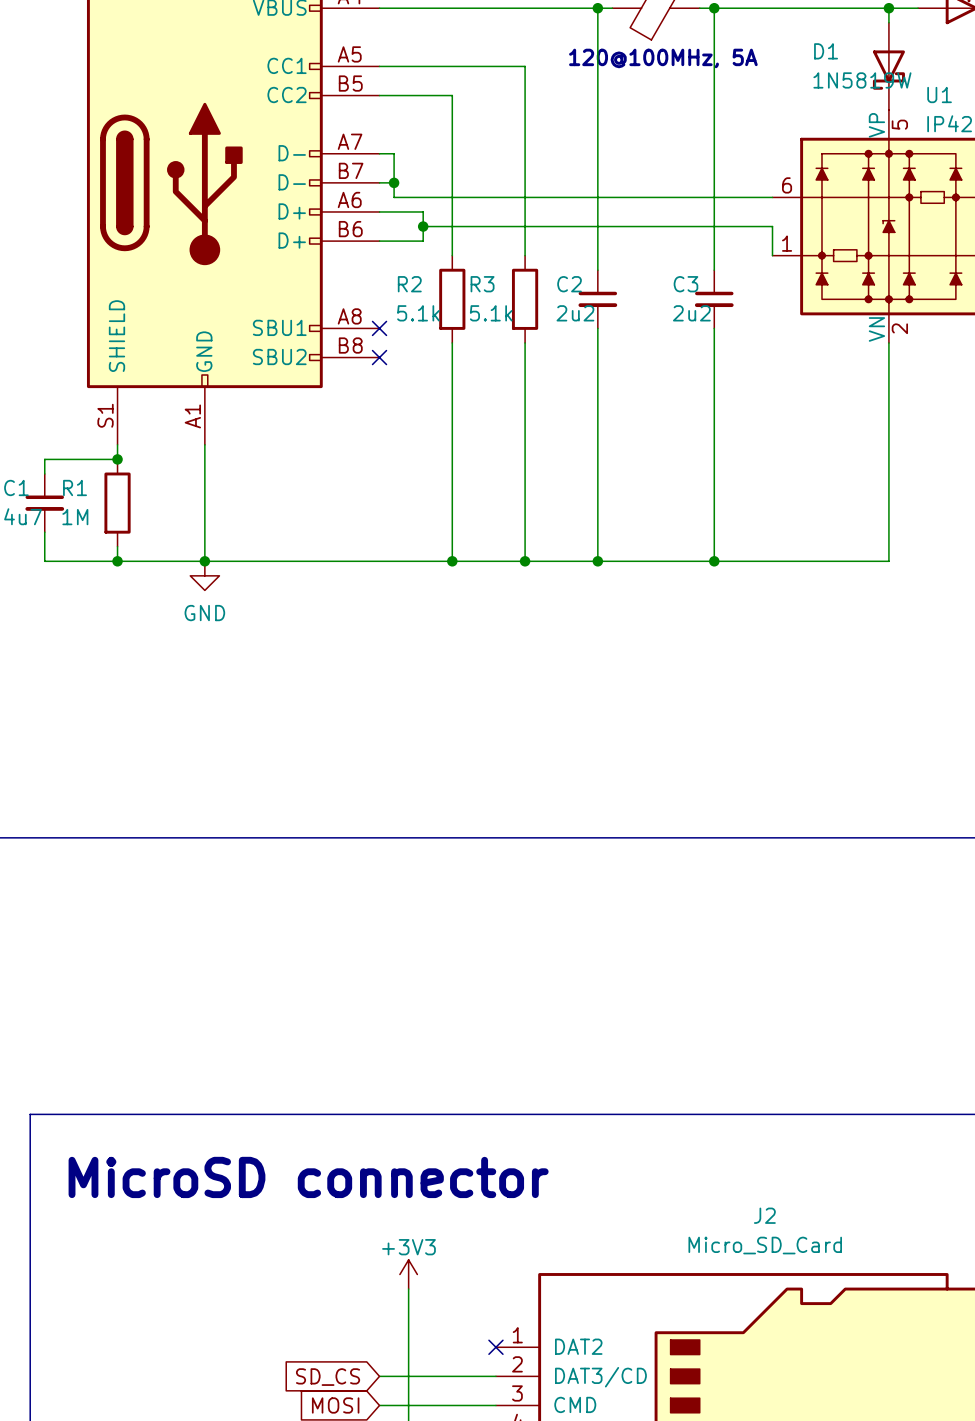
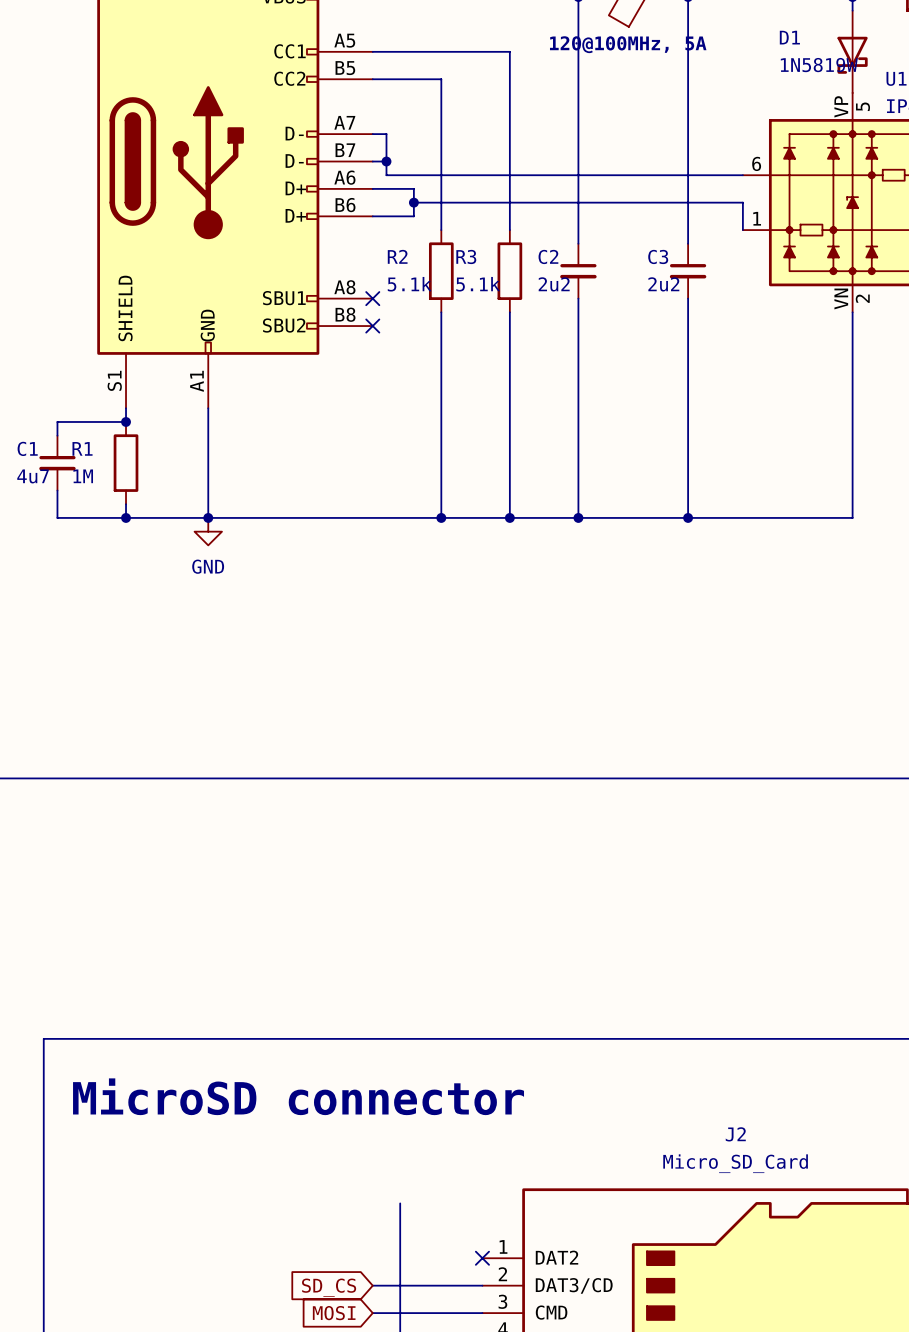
power symbol: +3V3 (408, 1274) -> none

